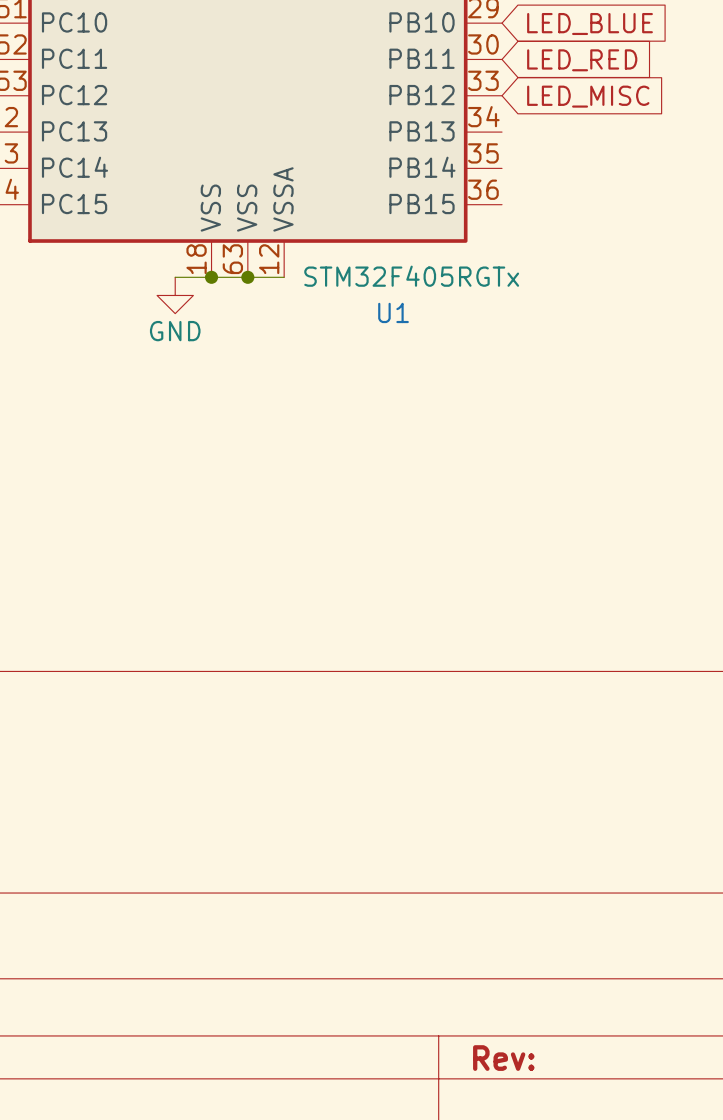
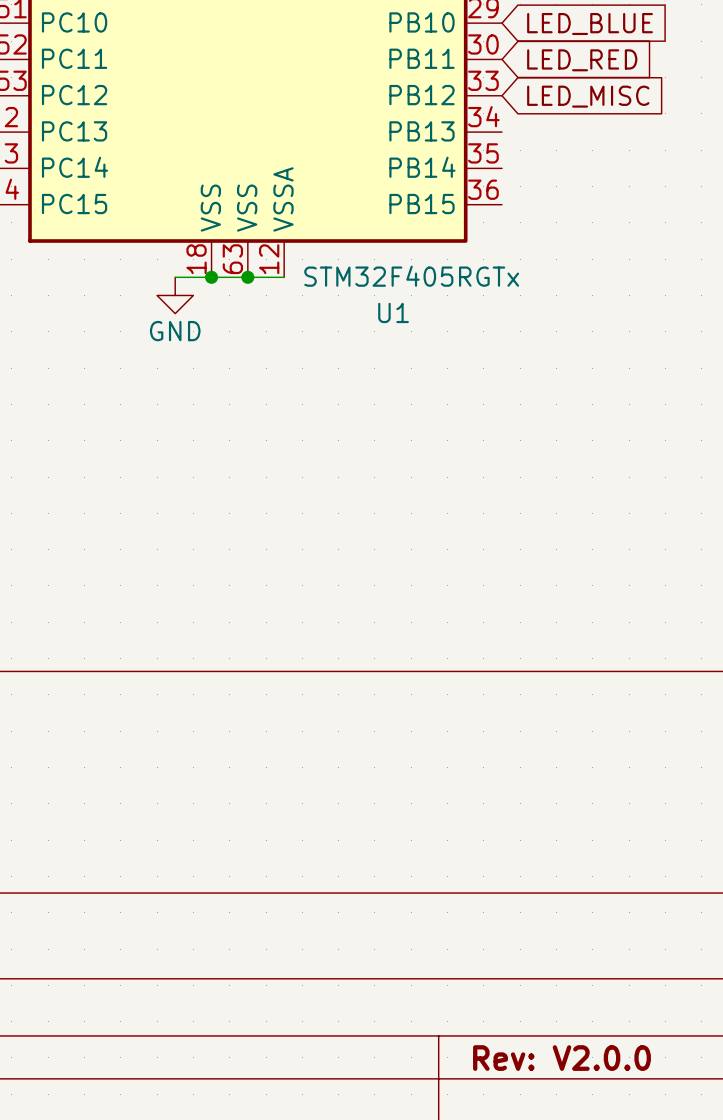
title block: Rev: (503, 1058) -> Rev: V2.0.0 (562, 1058)

